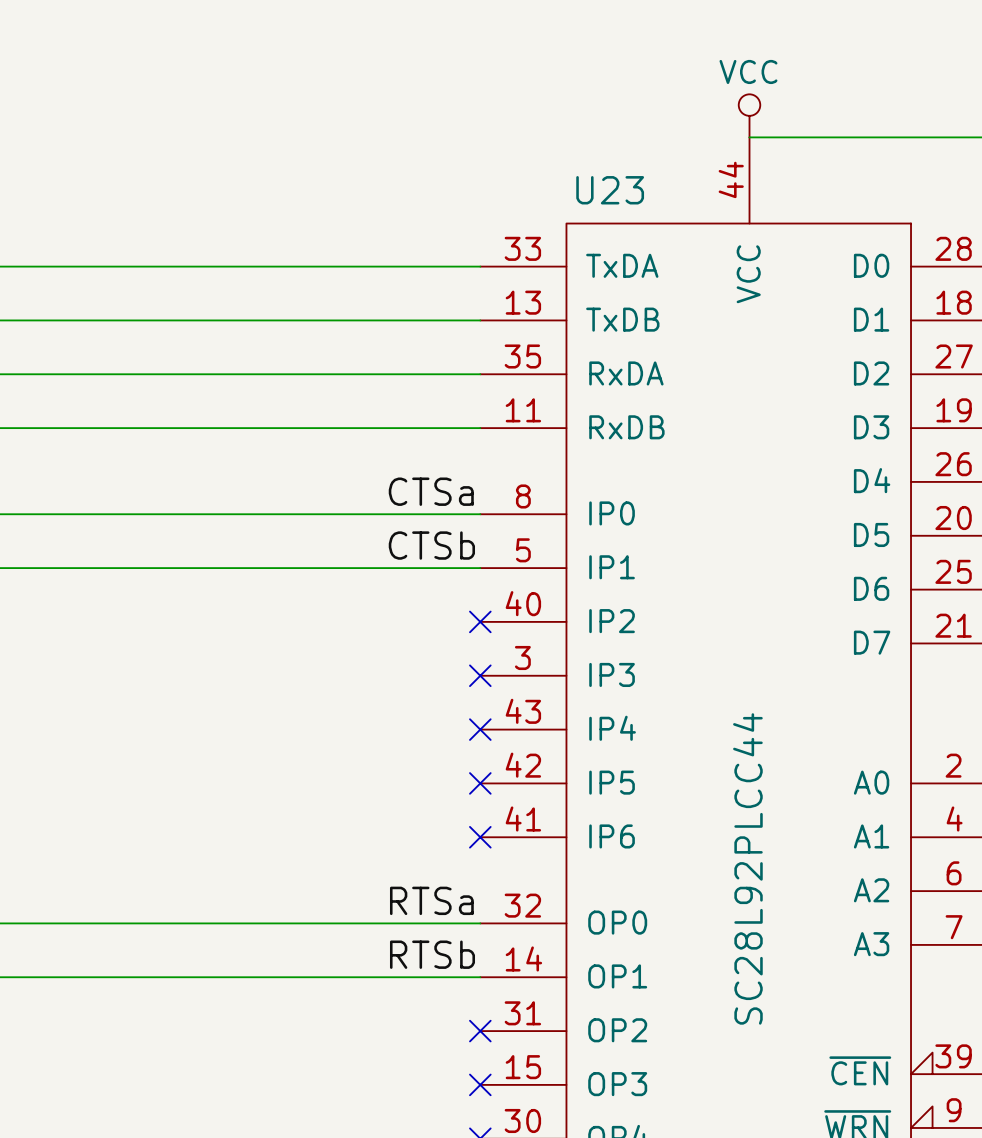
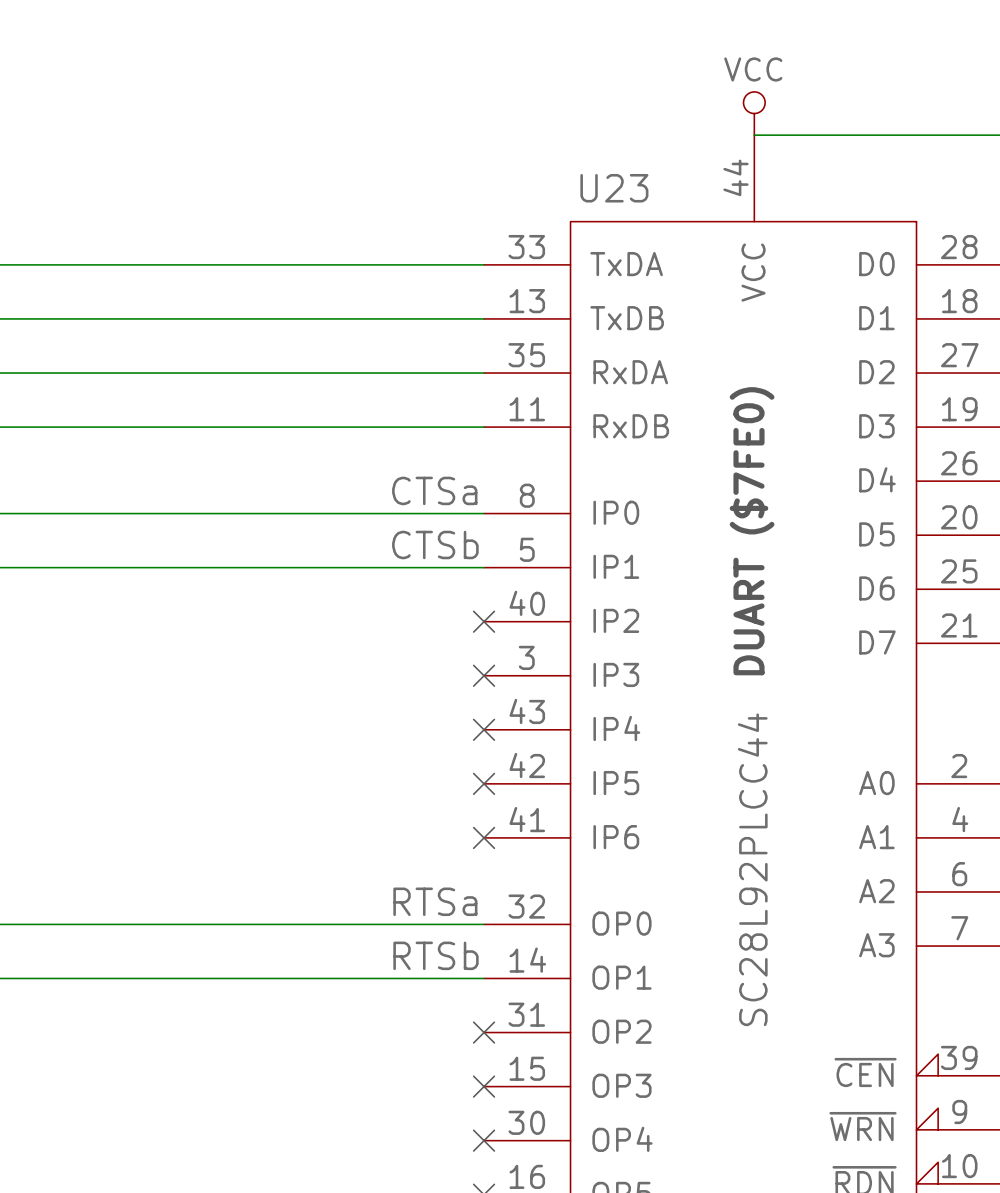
text: none -> DUART ($7FE0) (752, 531)

